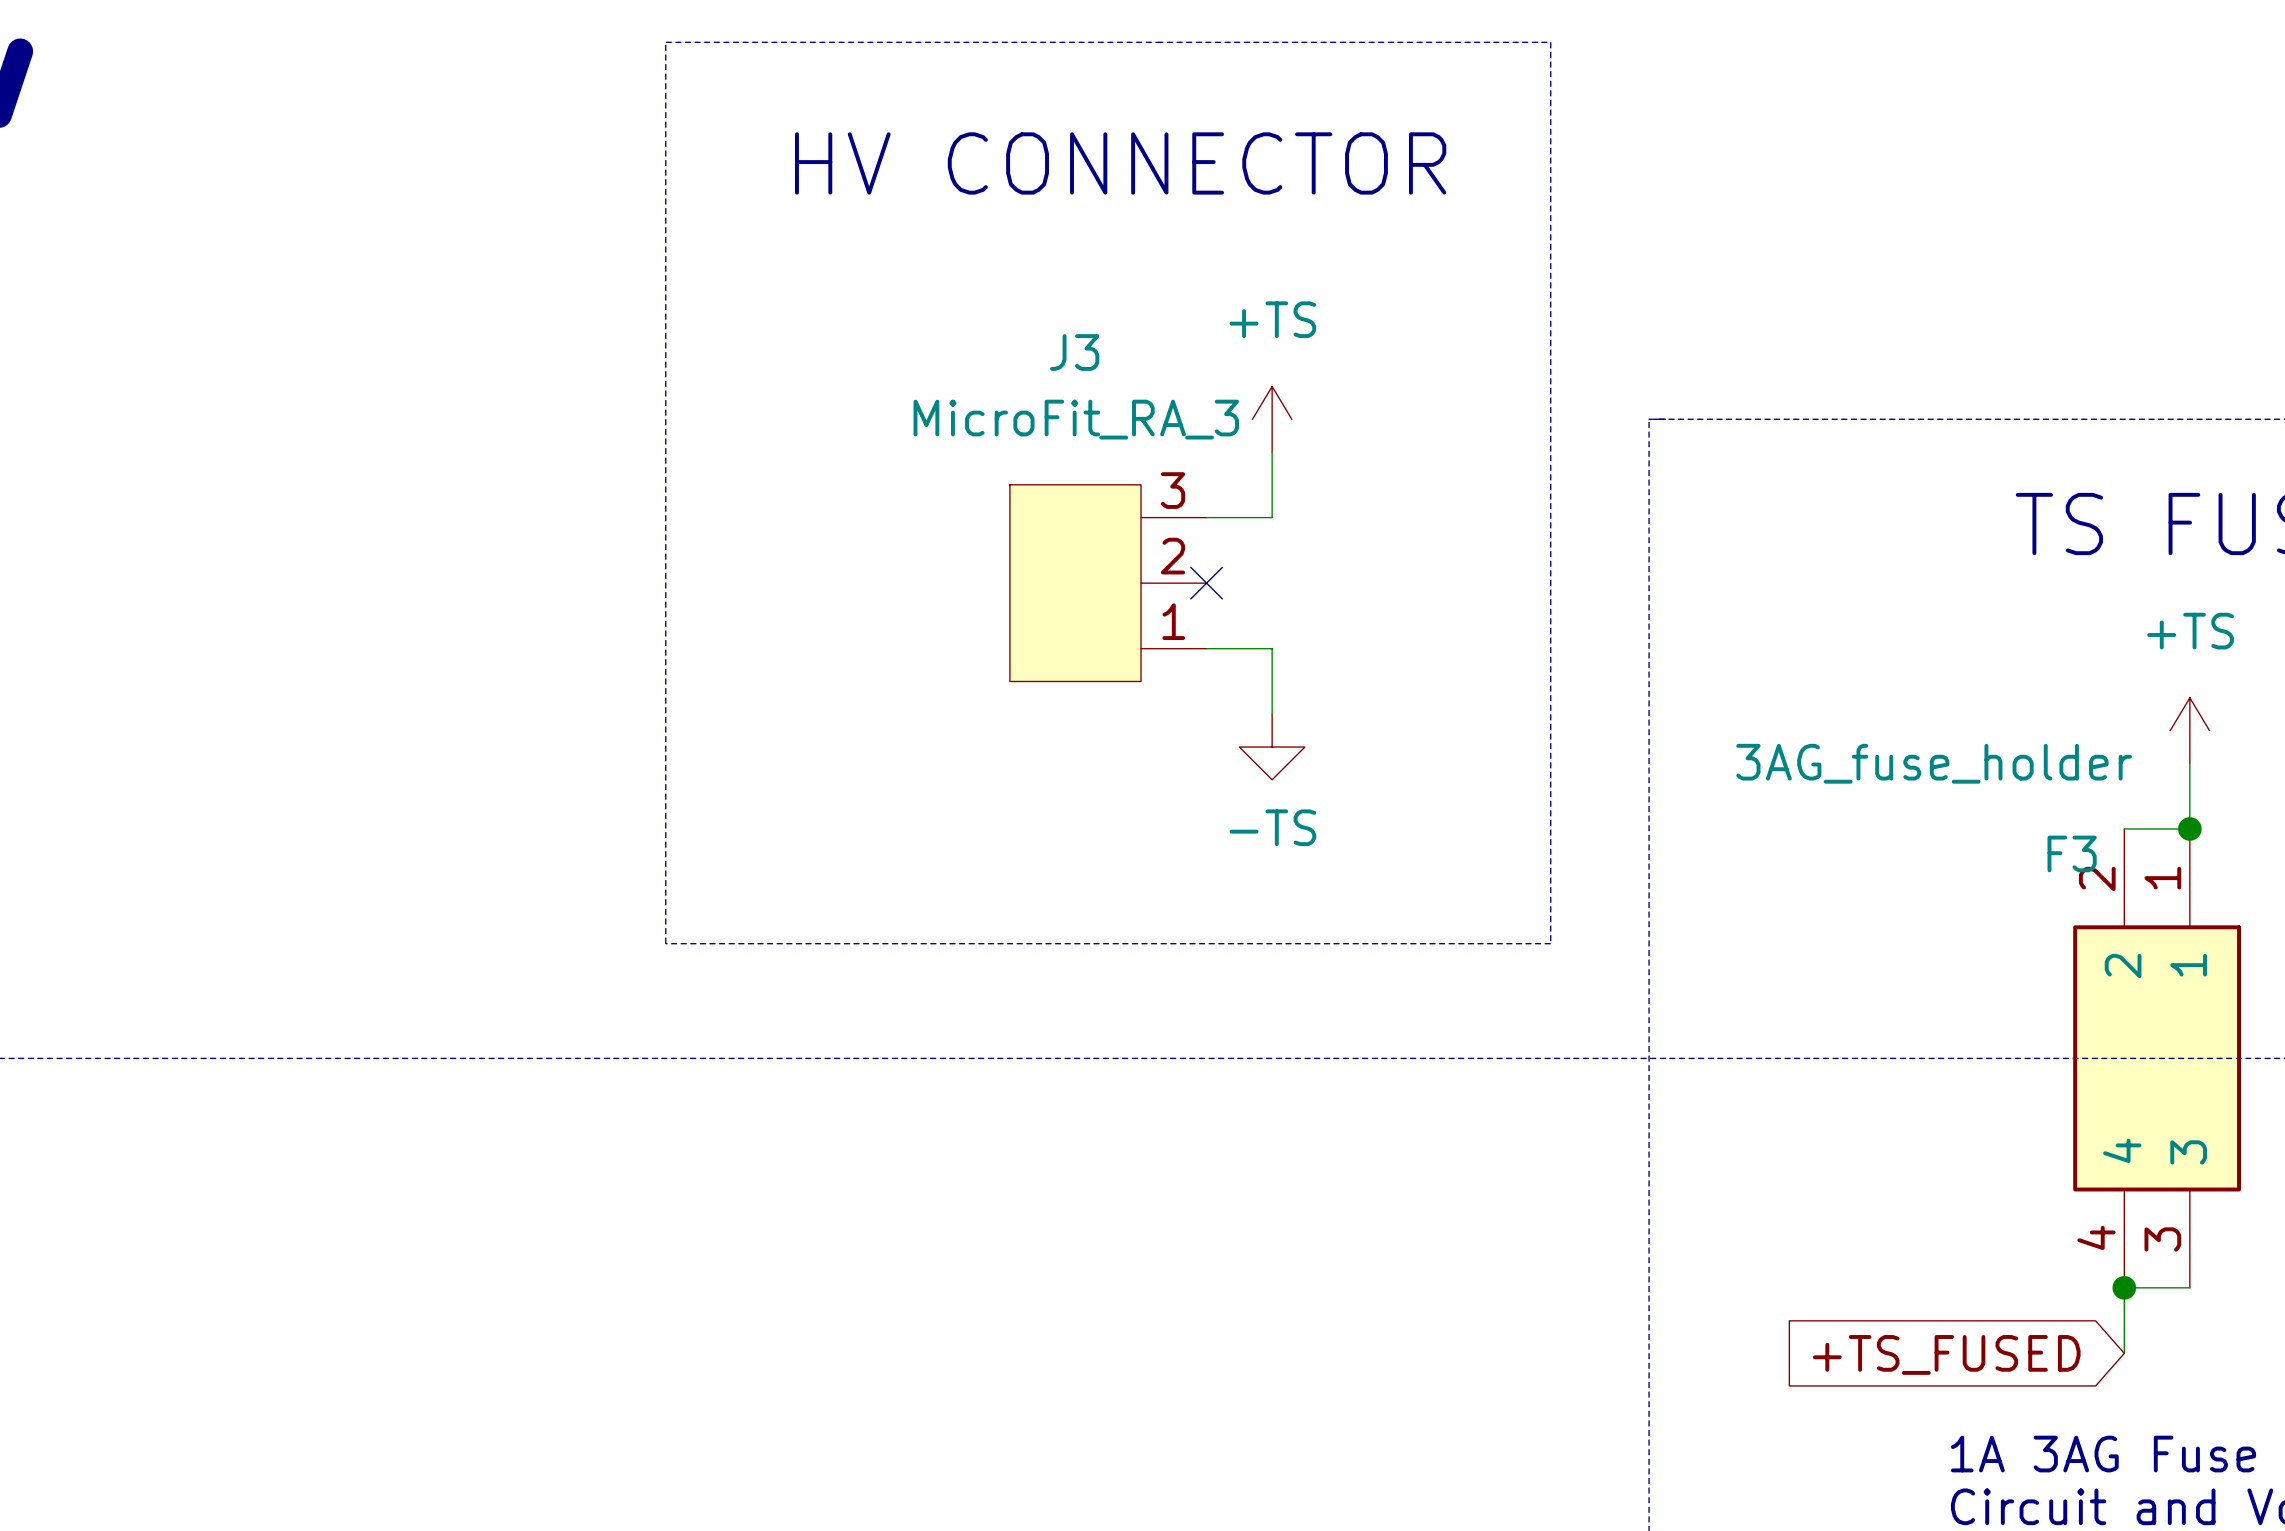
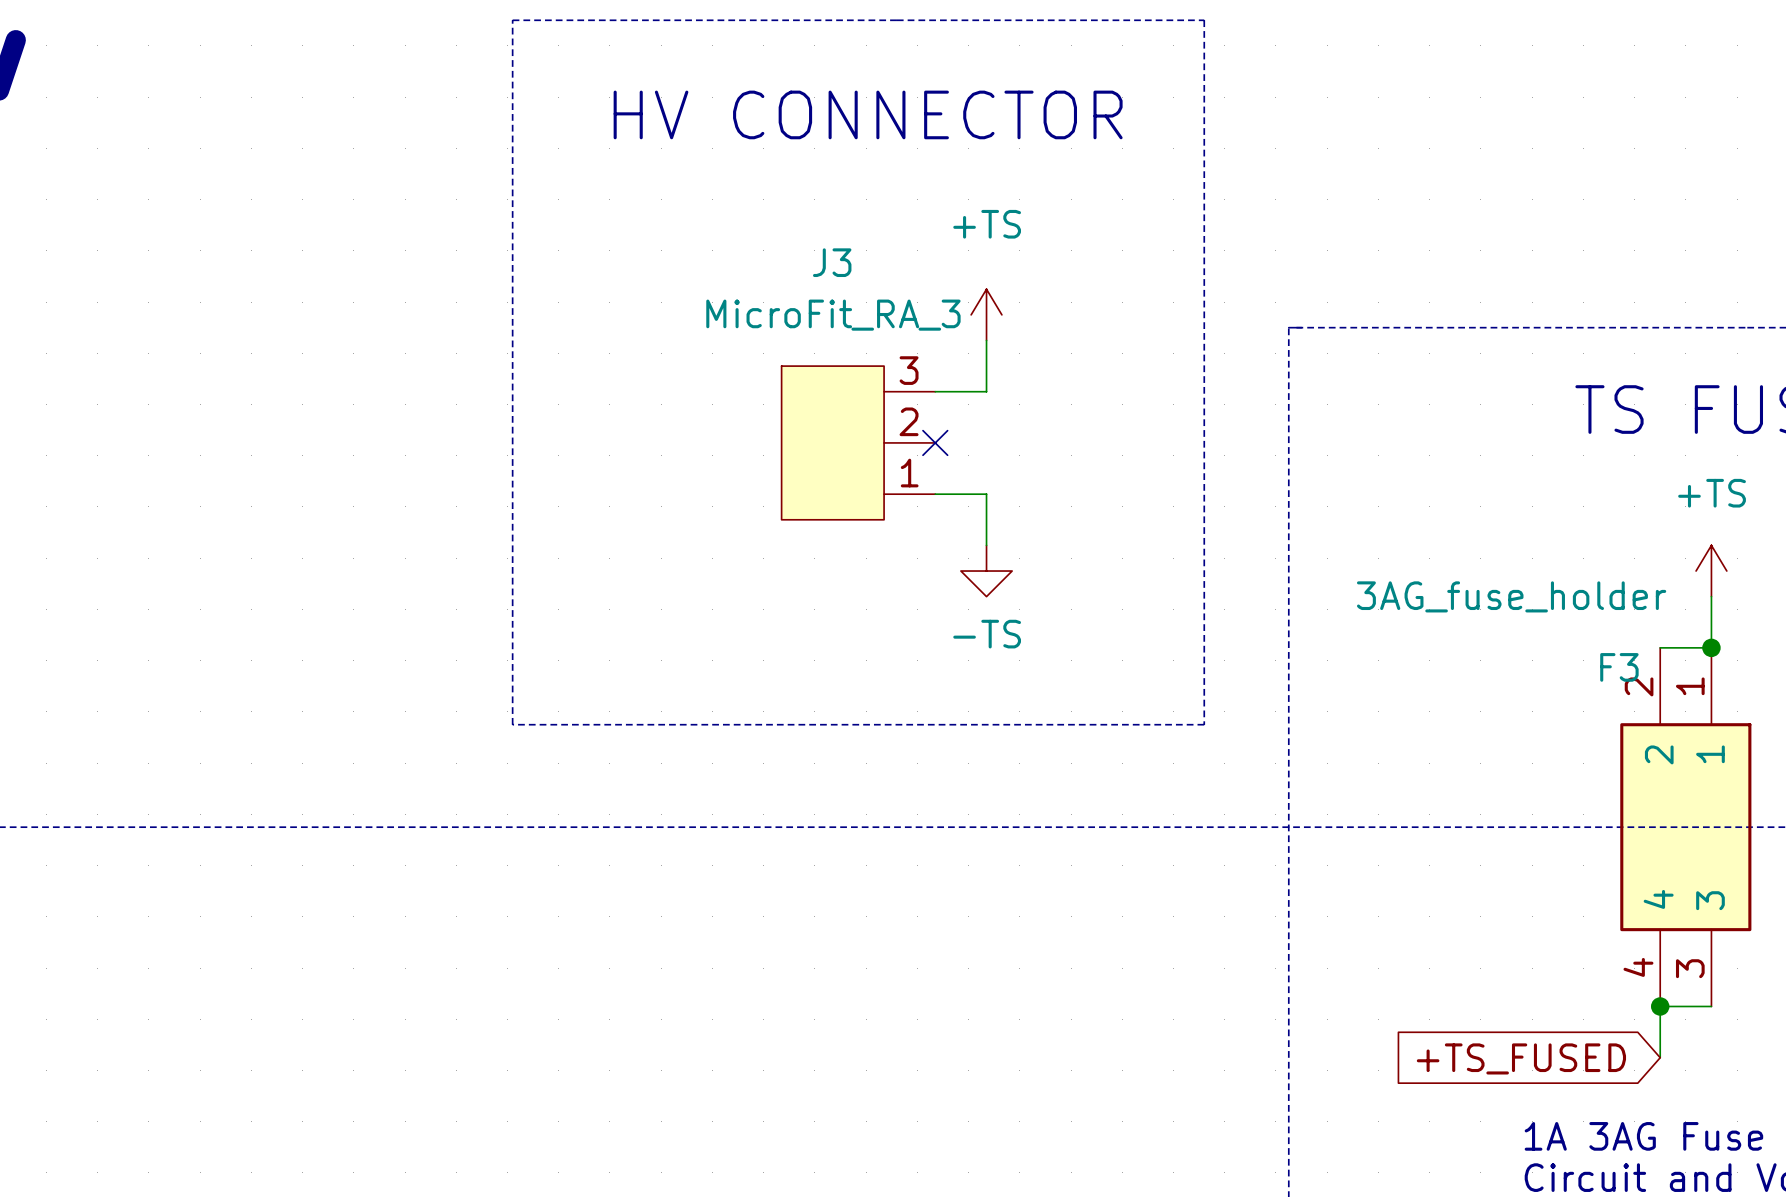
line: (665, 42) (1550, 42) (1550, 943) (665, 943) (665, 42) -> (512, 20) (1204, 20) (1204, 724) (512, 724) (512, 20)
text position: HV CONNECTOR (1120, 163) -> HV CONNECTOR (868, 114)
power symbol text position: +TS (1272, 319) -> +TS (987, 224)
power symbol position: +TS (1272, 419) -> +TS (986, 314)
wire: (1272, 452) (1272, 517) (1206, 517) -> (986, 340) (986, 391) (935, 391)
J3 position: (1108, 583) -> (858, 442)
no-connect mark position: (1206, 583) -> (935, 442)
wire: (1206, 648) (1272, 648) (1272, 714) -> (935, 494) (986, 494) (986, 545)
power symbol position: -TS (1272, 747) -> -TS (986, 571)

